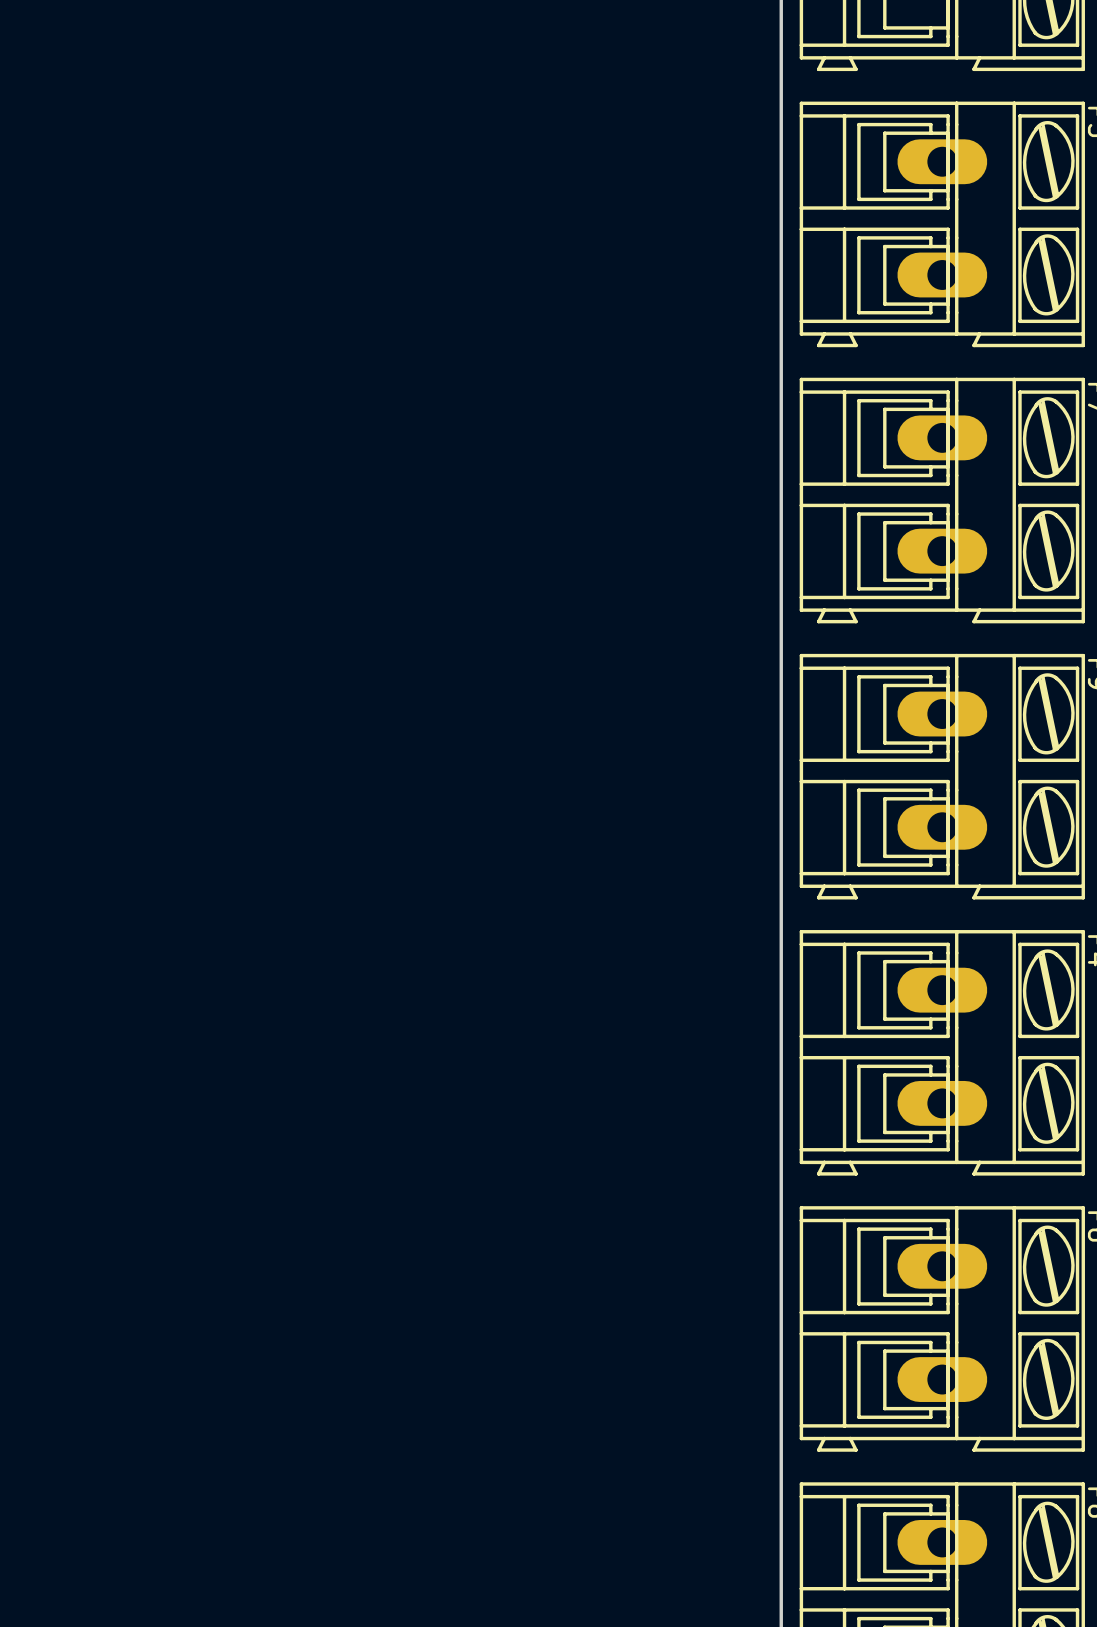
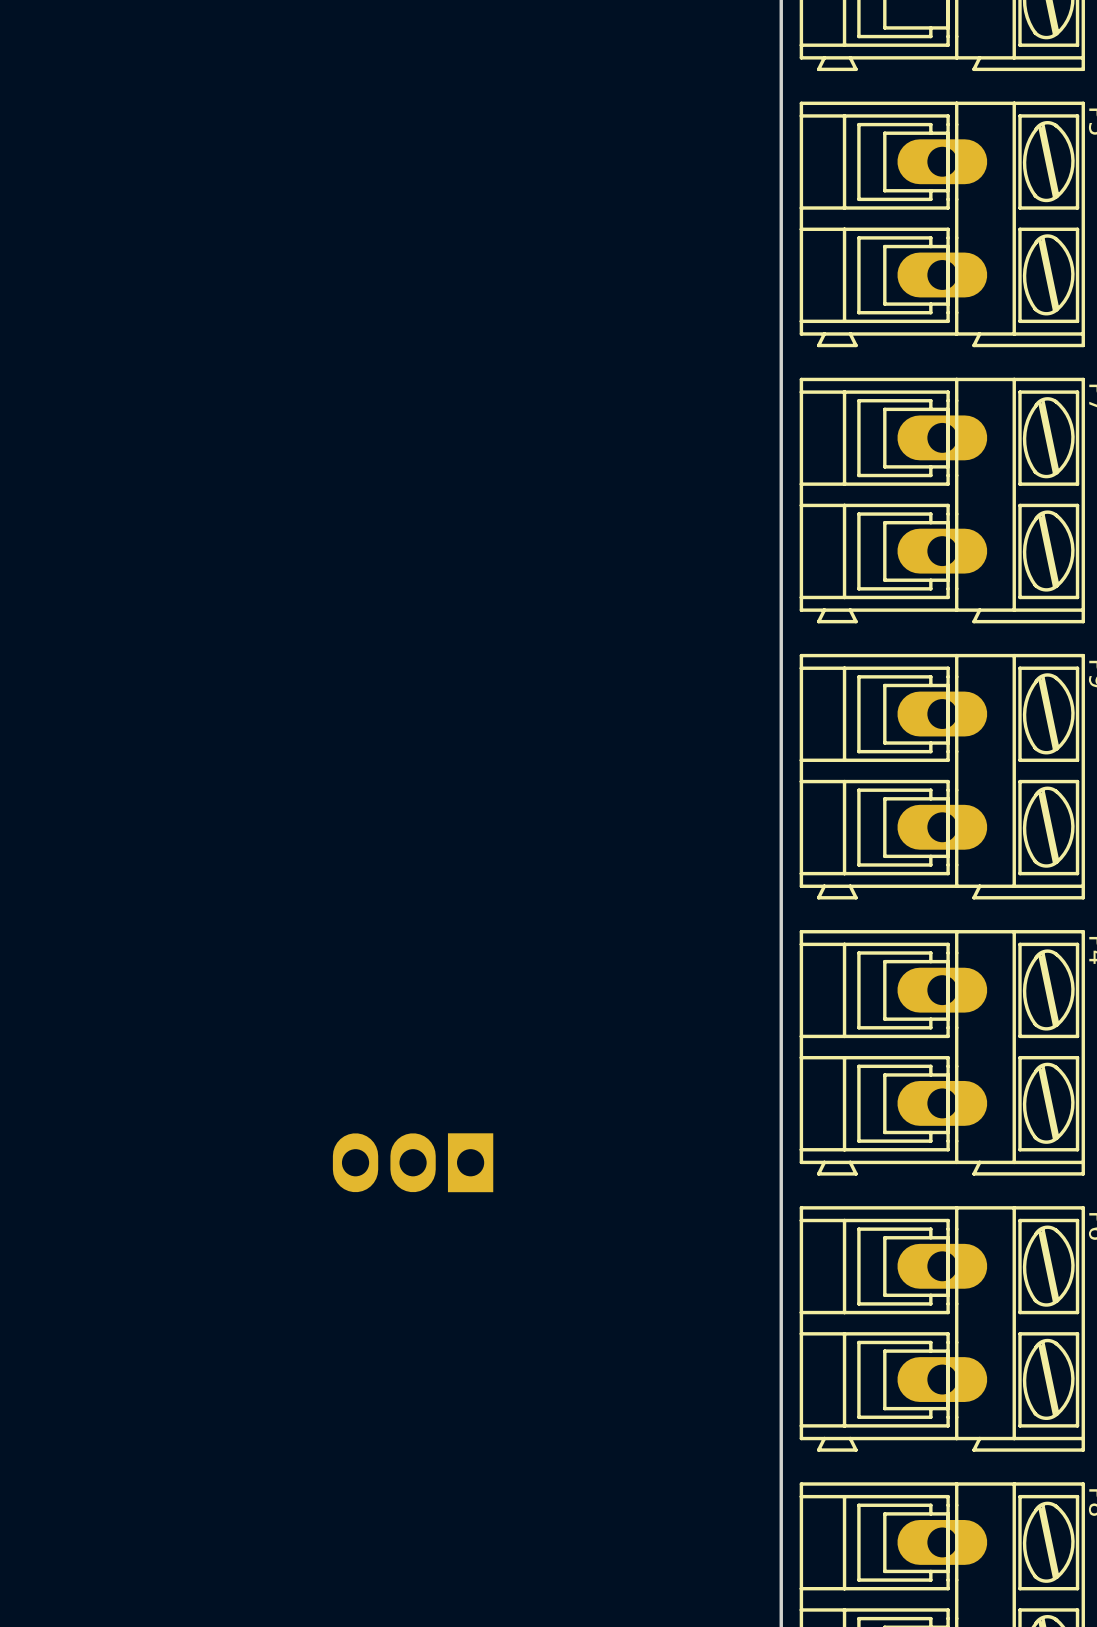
part: none -> (413, 1162)

